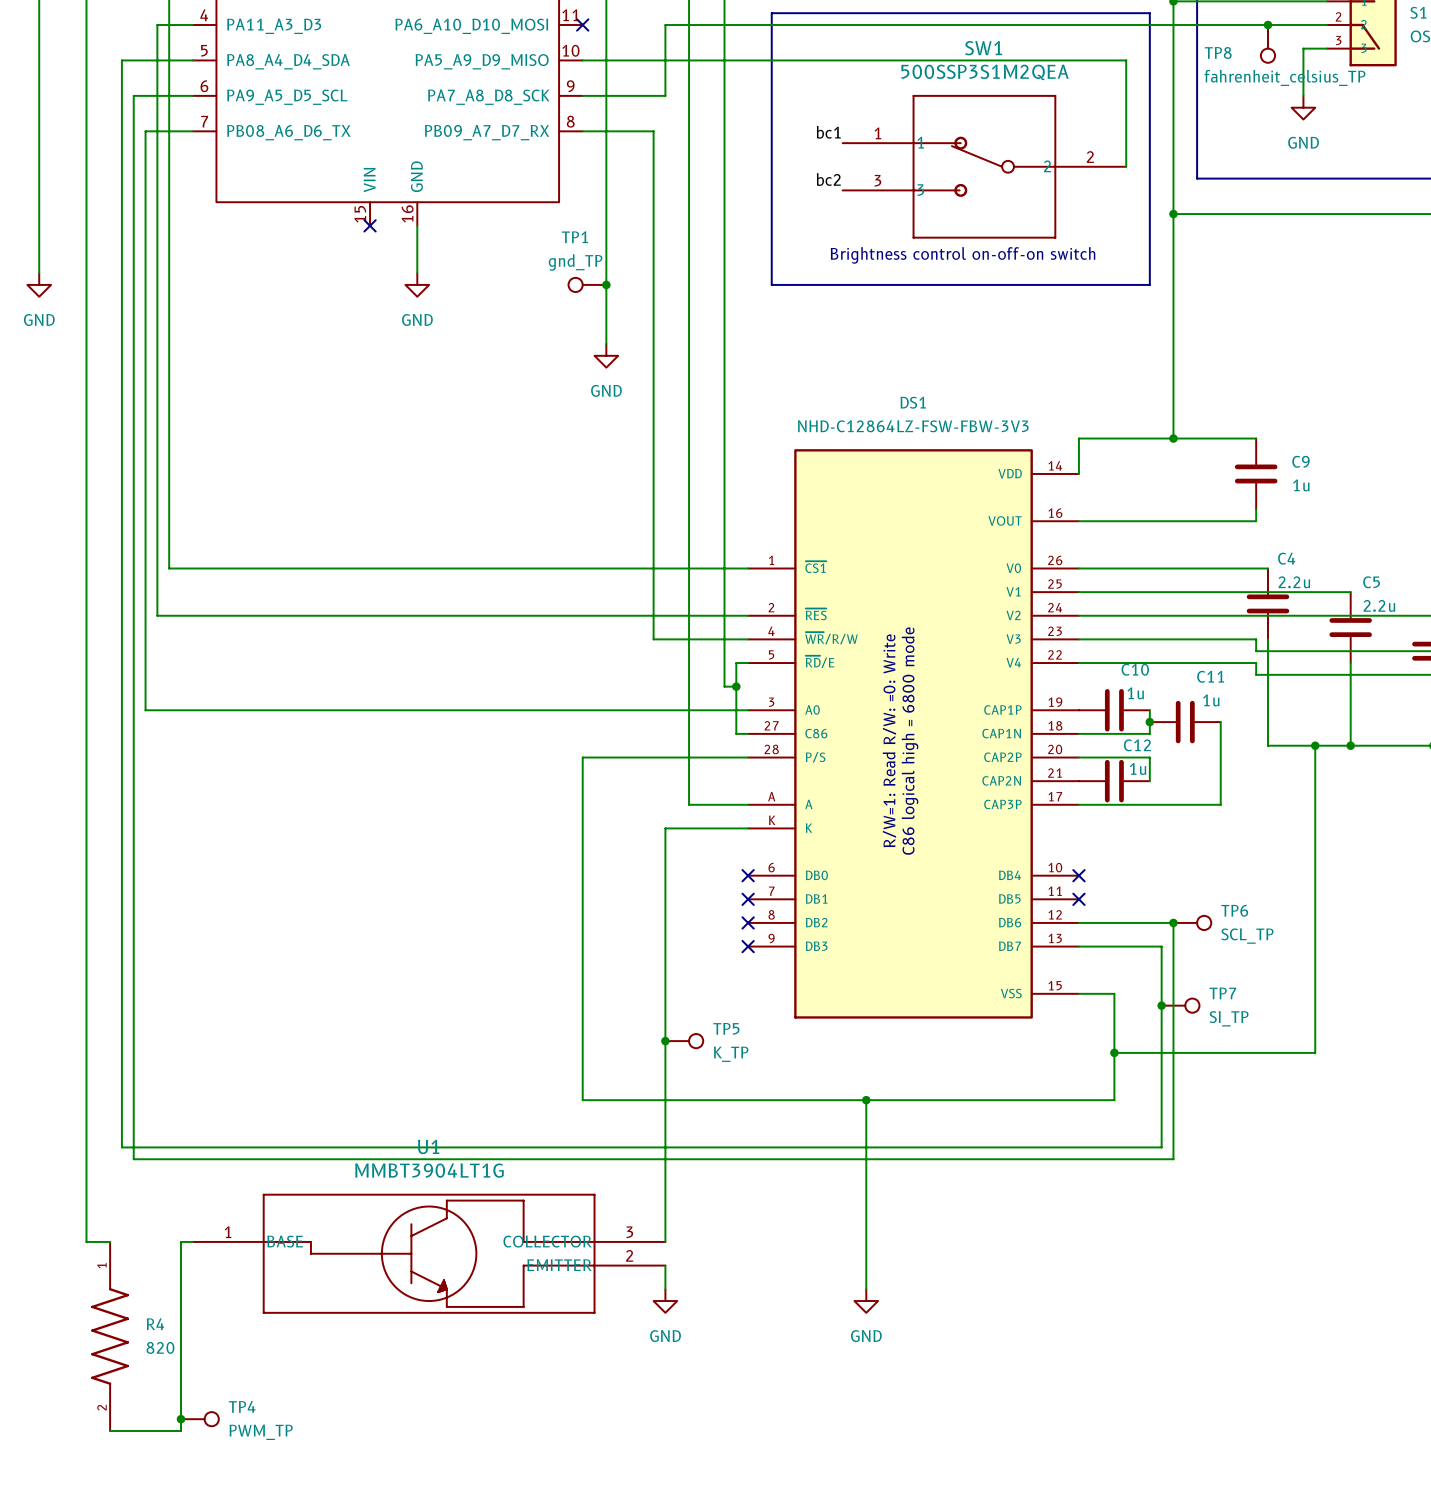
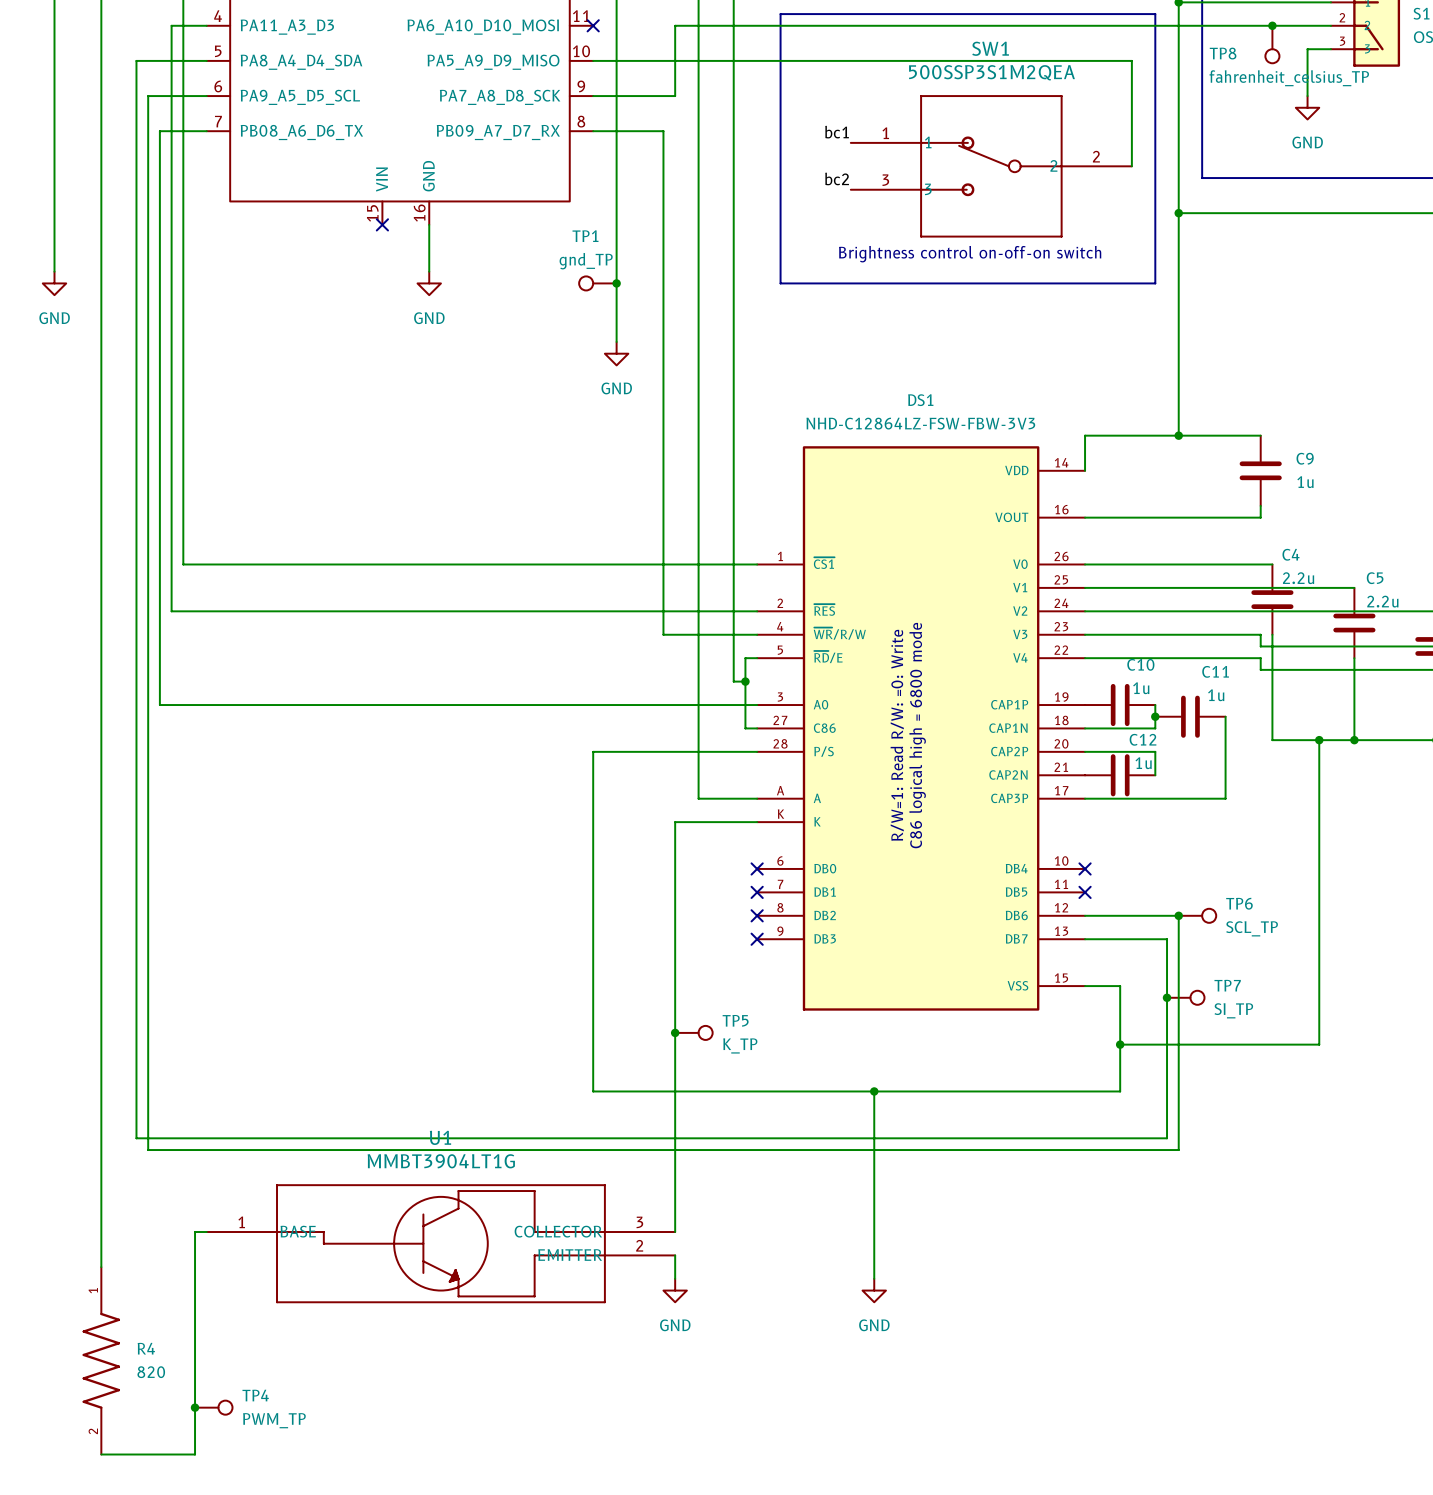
wire: (86, 1241) (110, 1241) -> (101, 1232) (101, 1267)
R4 position: (110, 1336) -> (101, 1360)
wire: (110, 1430) (181, 1430) -> (101, 1454) (195, 1454) (195, 1419)

